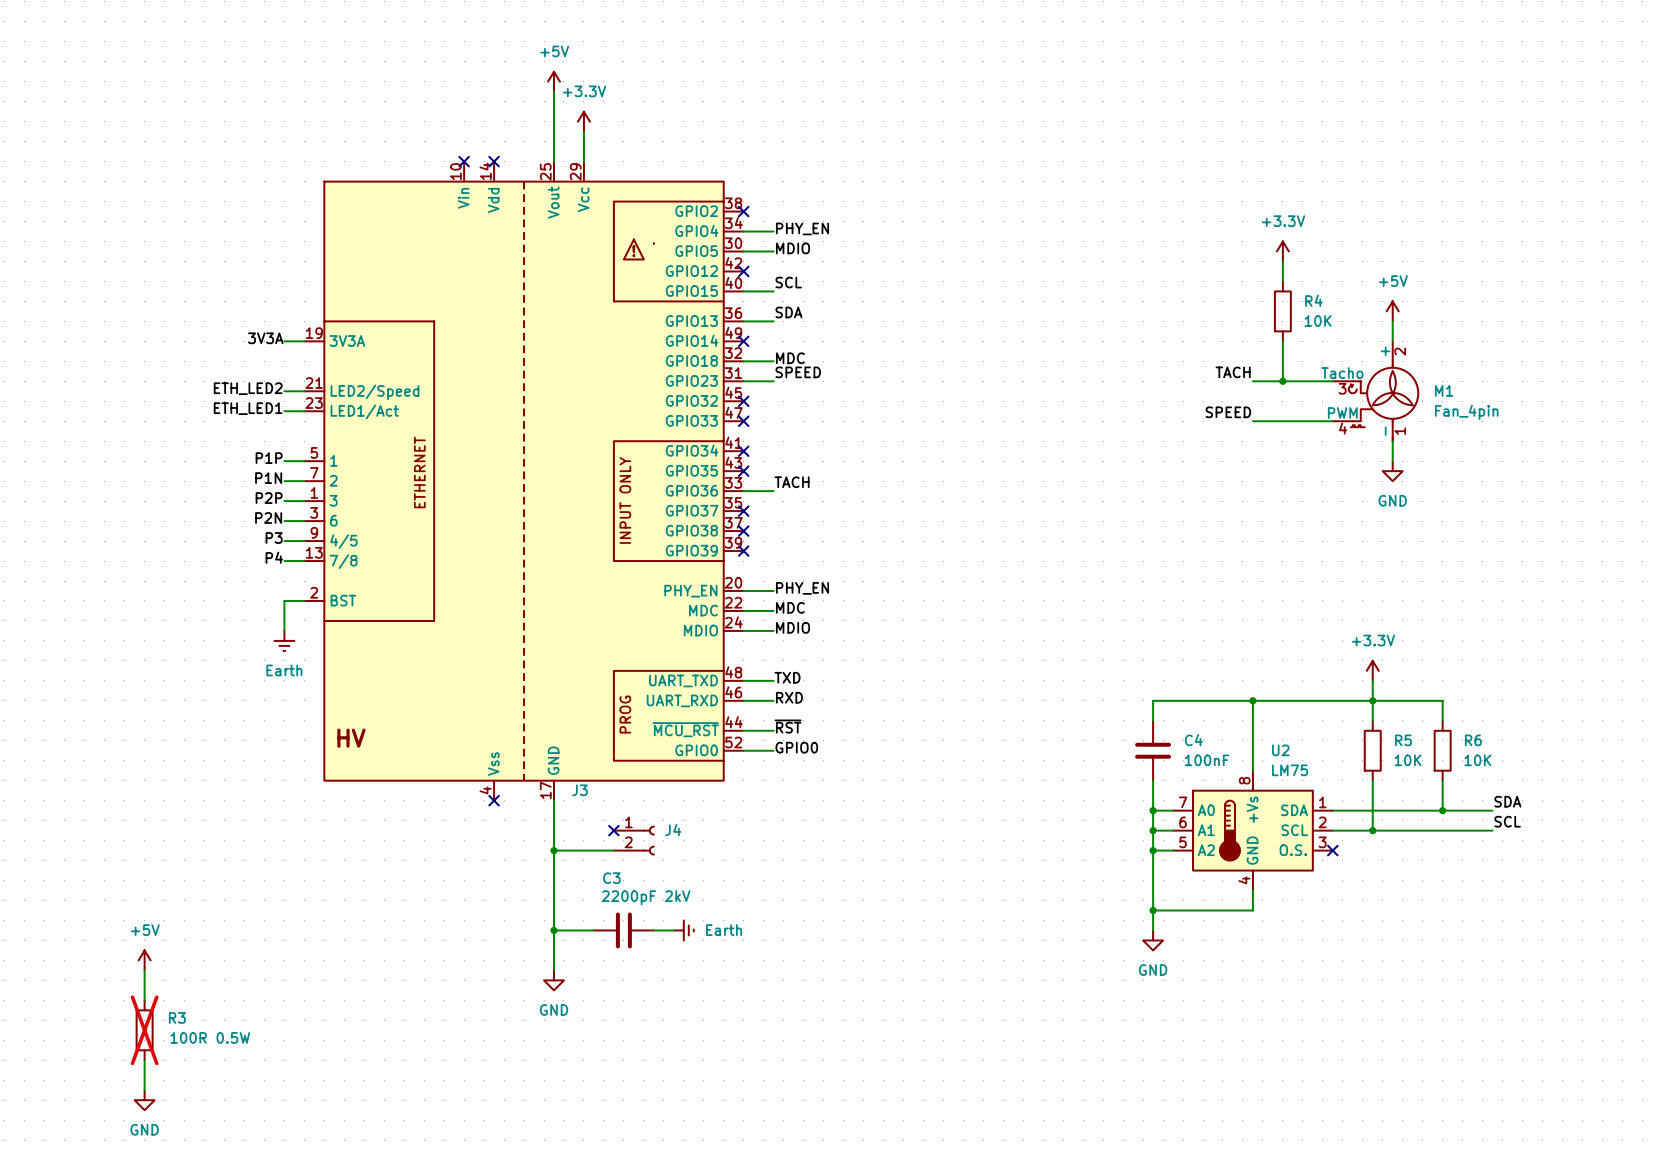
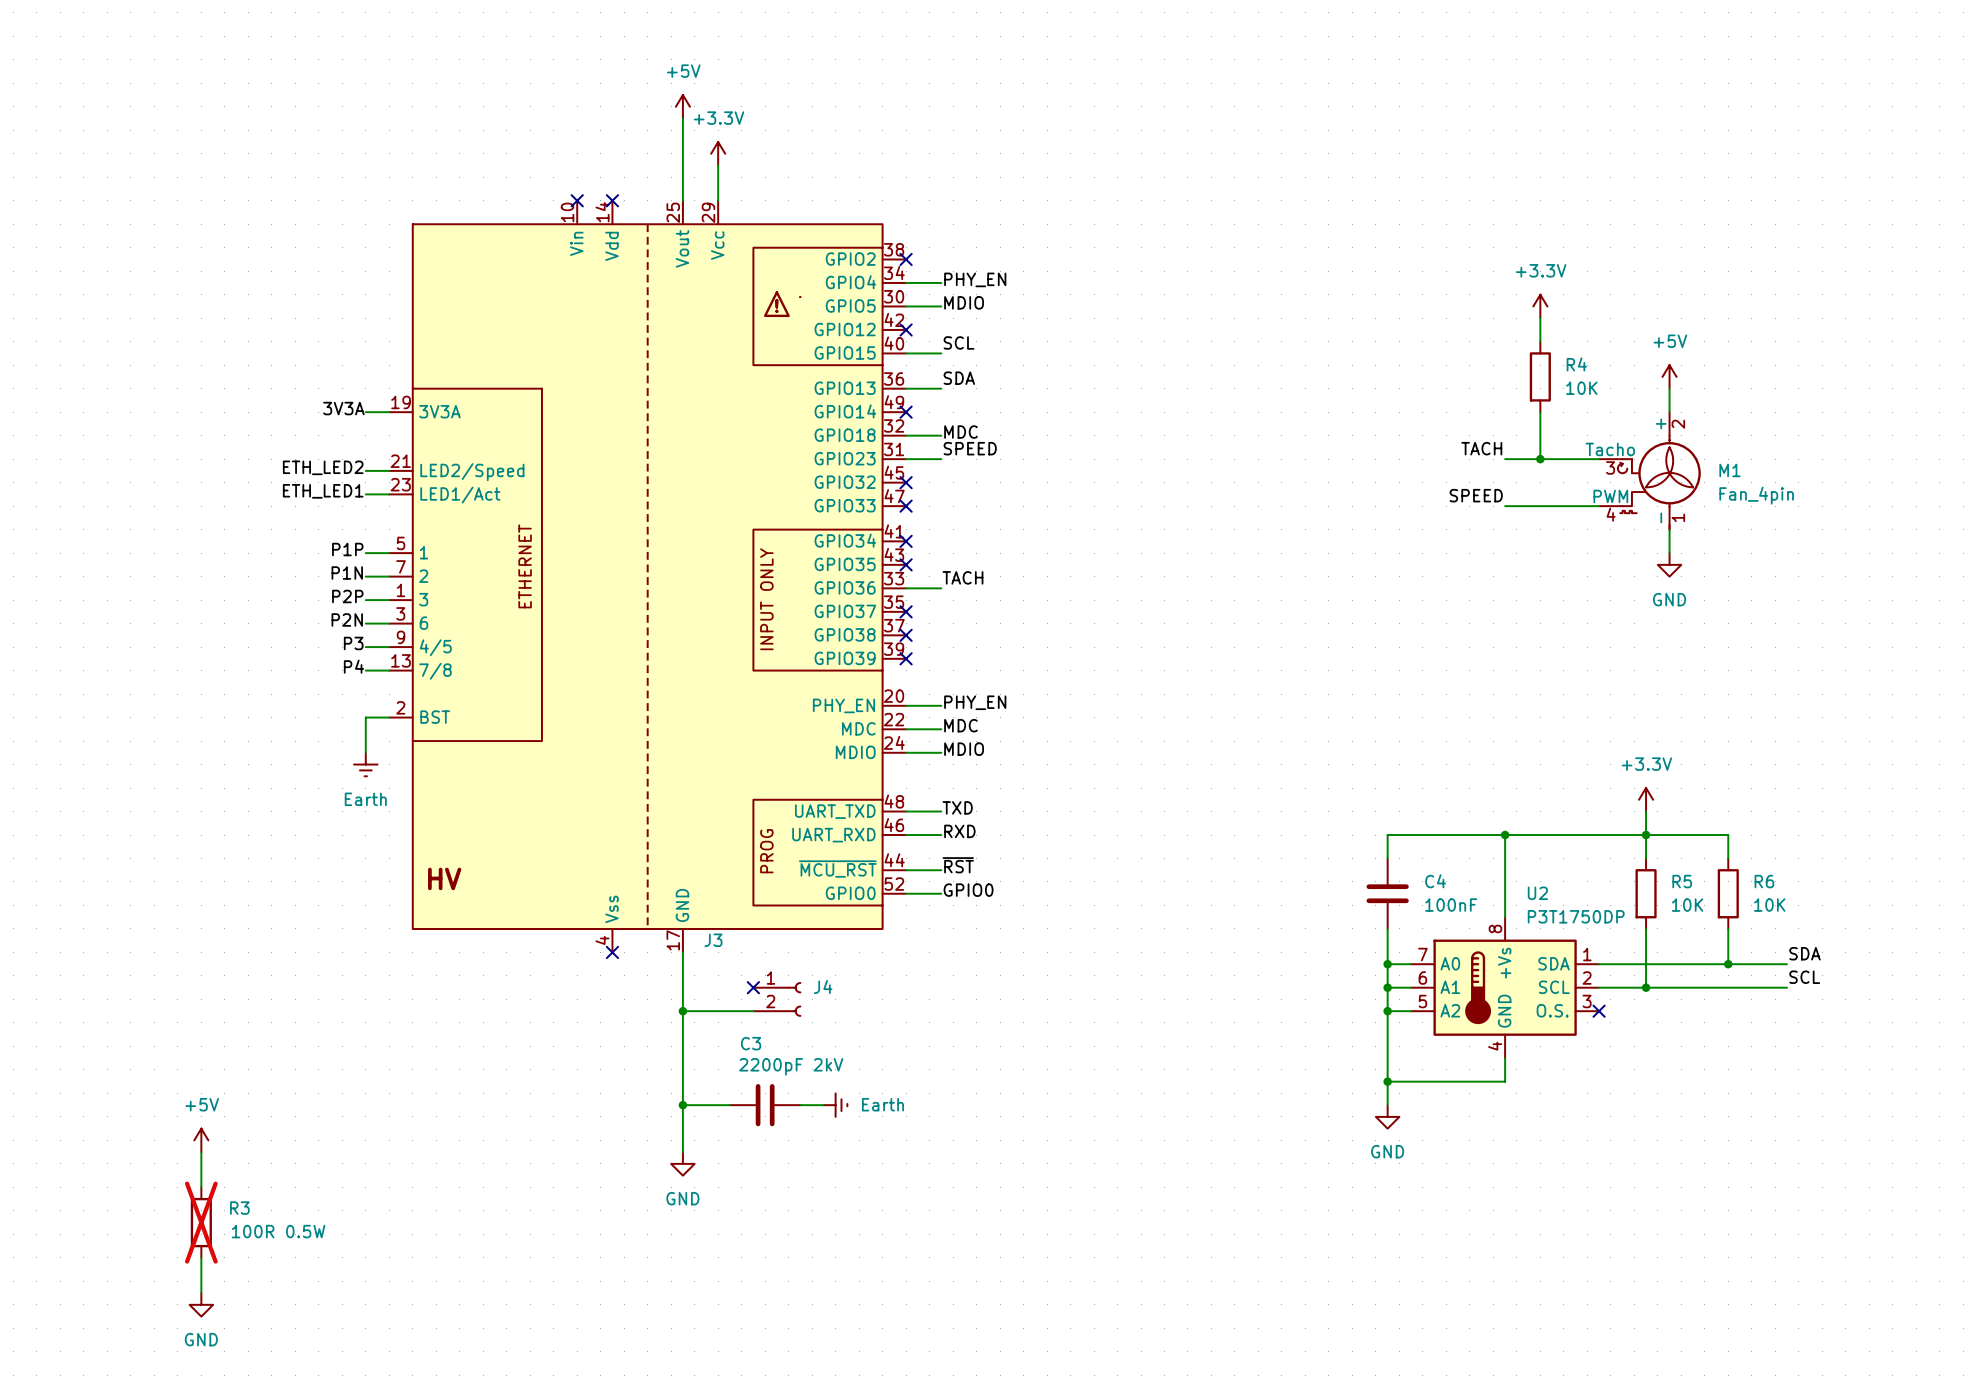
U2 value: LM75 (1290, 770) -> P3T1750DP (1576, 916)

